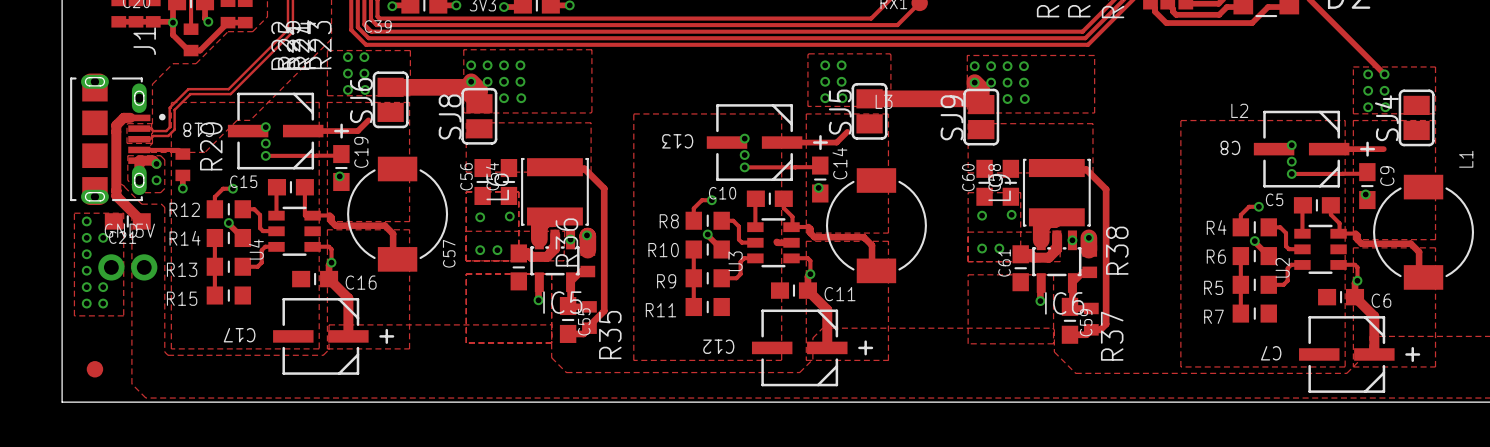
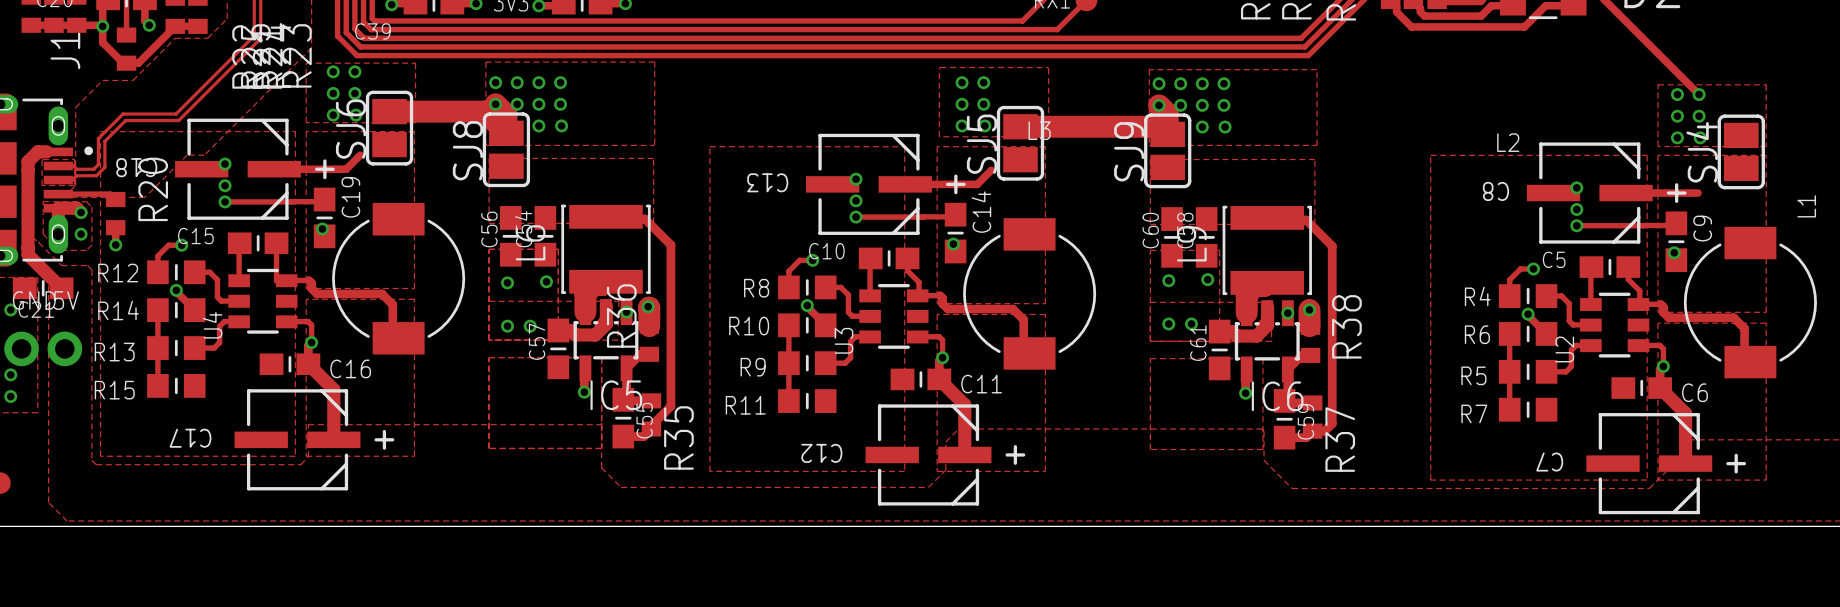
track: (776, 241) (791, 242) -> none
C57 name position: C57 (449, 253) -> C57 (537, 341)

